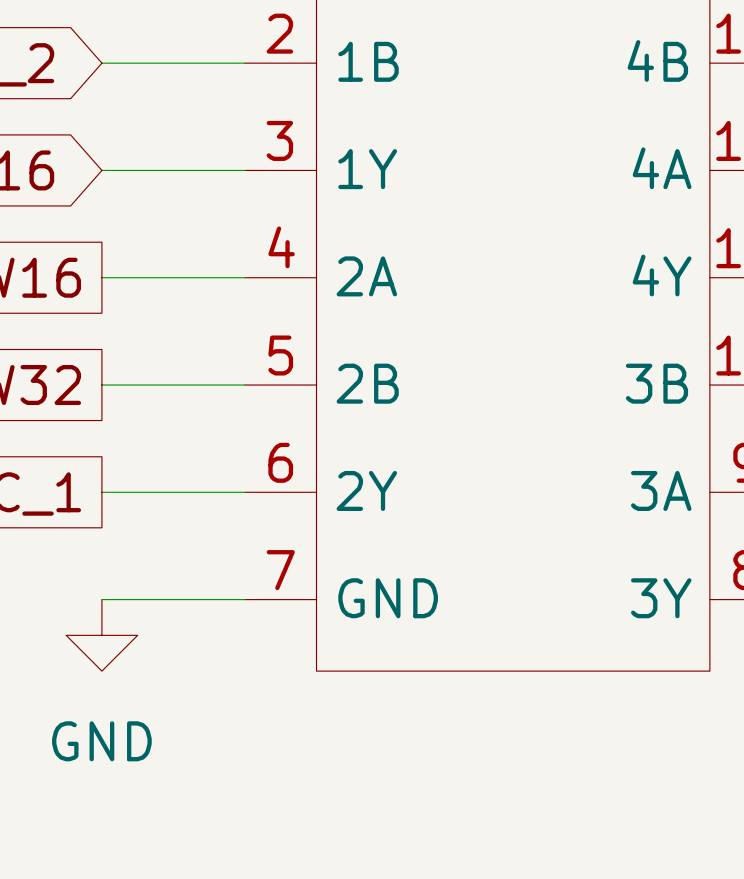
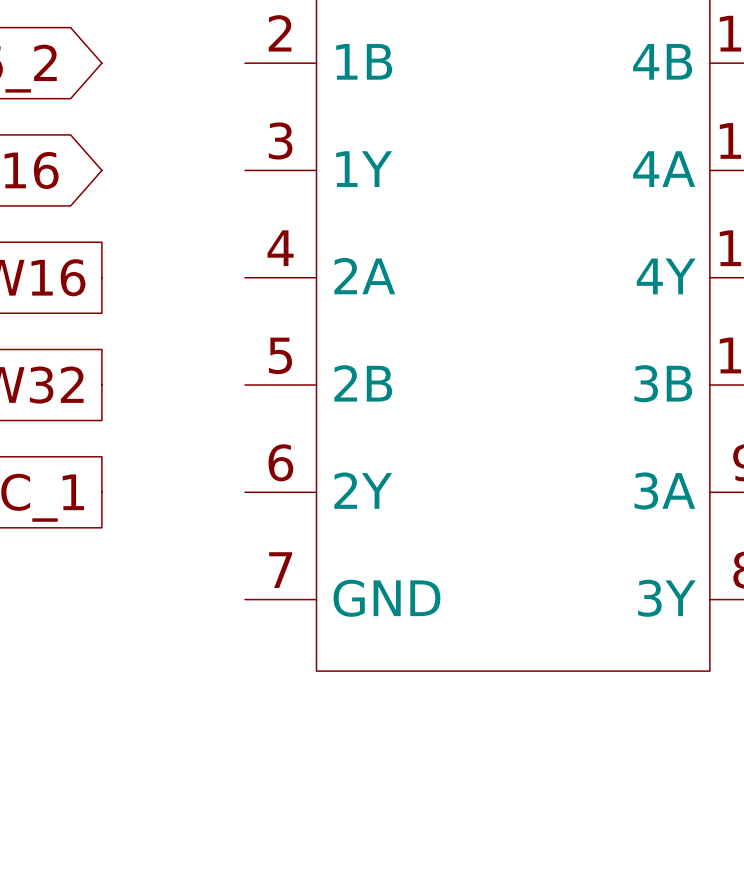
wire: (101, 63) (244, 63) -> none
wire: (101, 170) (244, 170) -> none
wire: (101, 277) (244, 277) -> none
wire: (101, 385) (244, 385) -> none
wire: (101, 492) (244, 492) -> none
wire: (101, 599) (244, 599) -> none
power symbol: GND (101, 635) -> none

